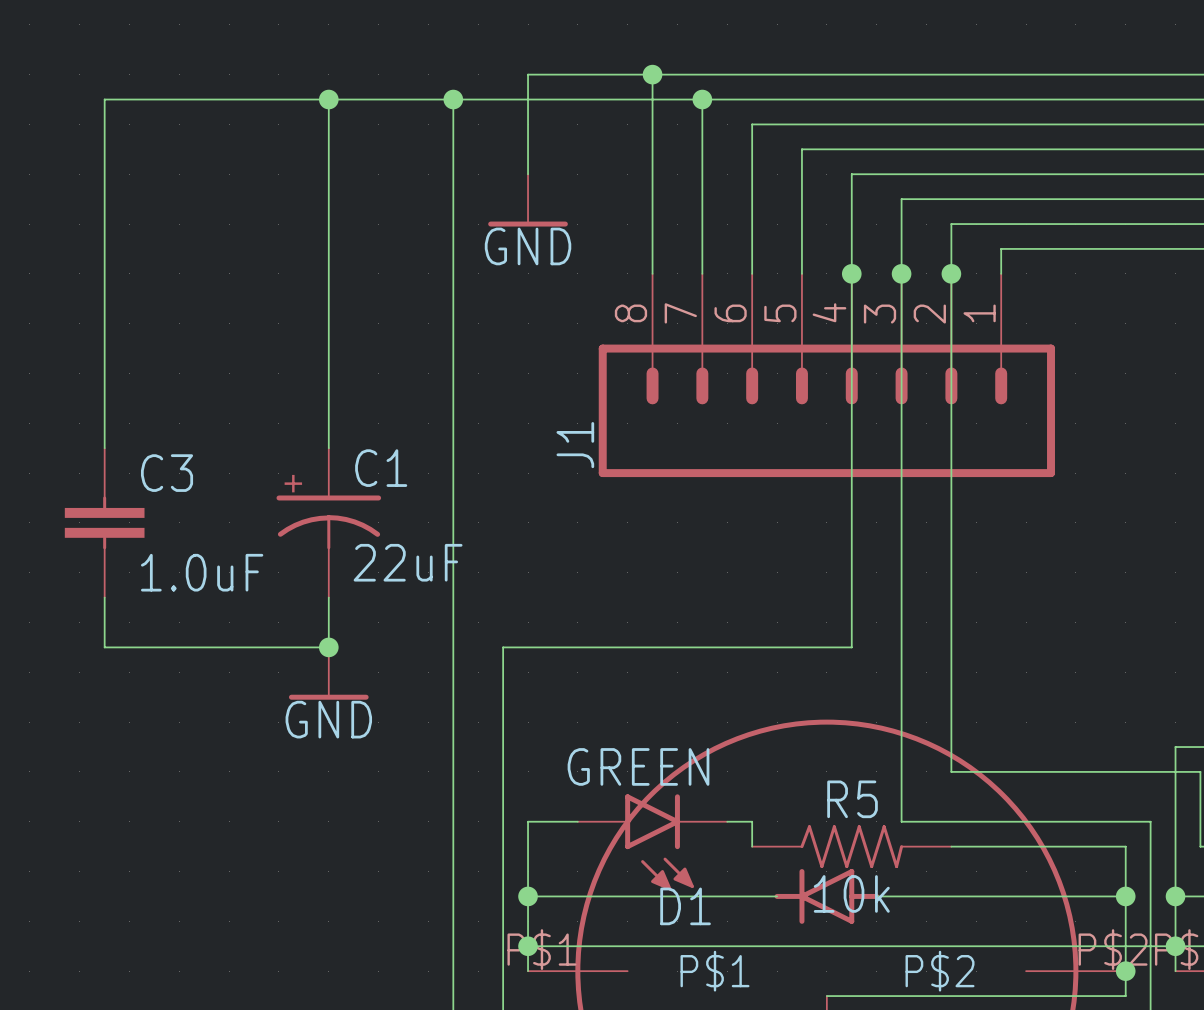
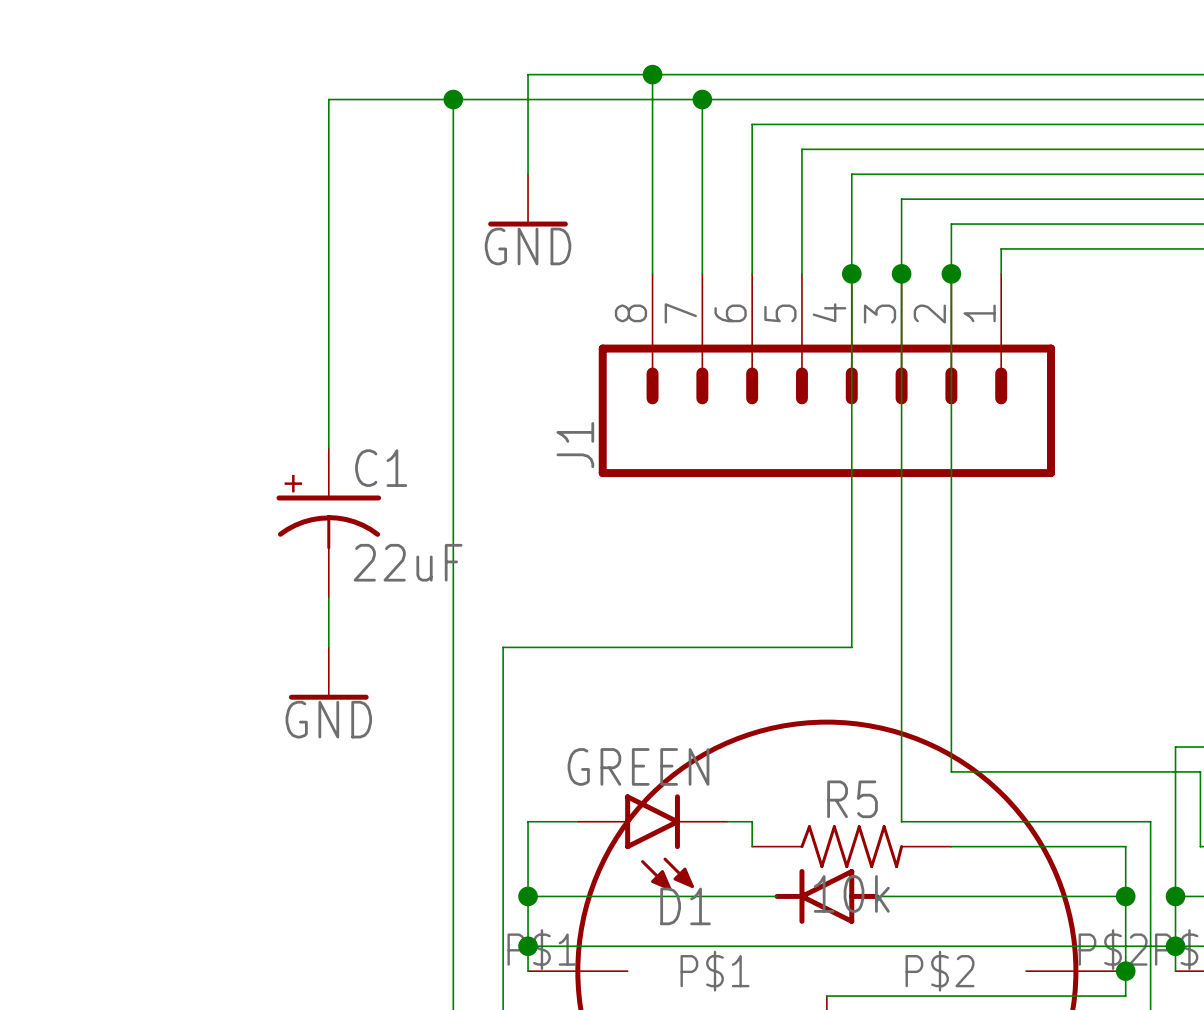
wire: (328, 99) (104, 99) (104, 448) -> none
junction: (328, 99) -> none
C3: 1.0uF (104, 522) -> none
wire: (104, 597) (104, 647) (328, 647) -> none
junction: (328, 647) -> none

